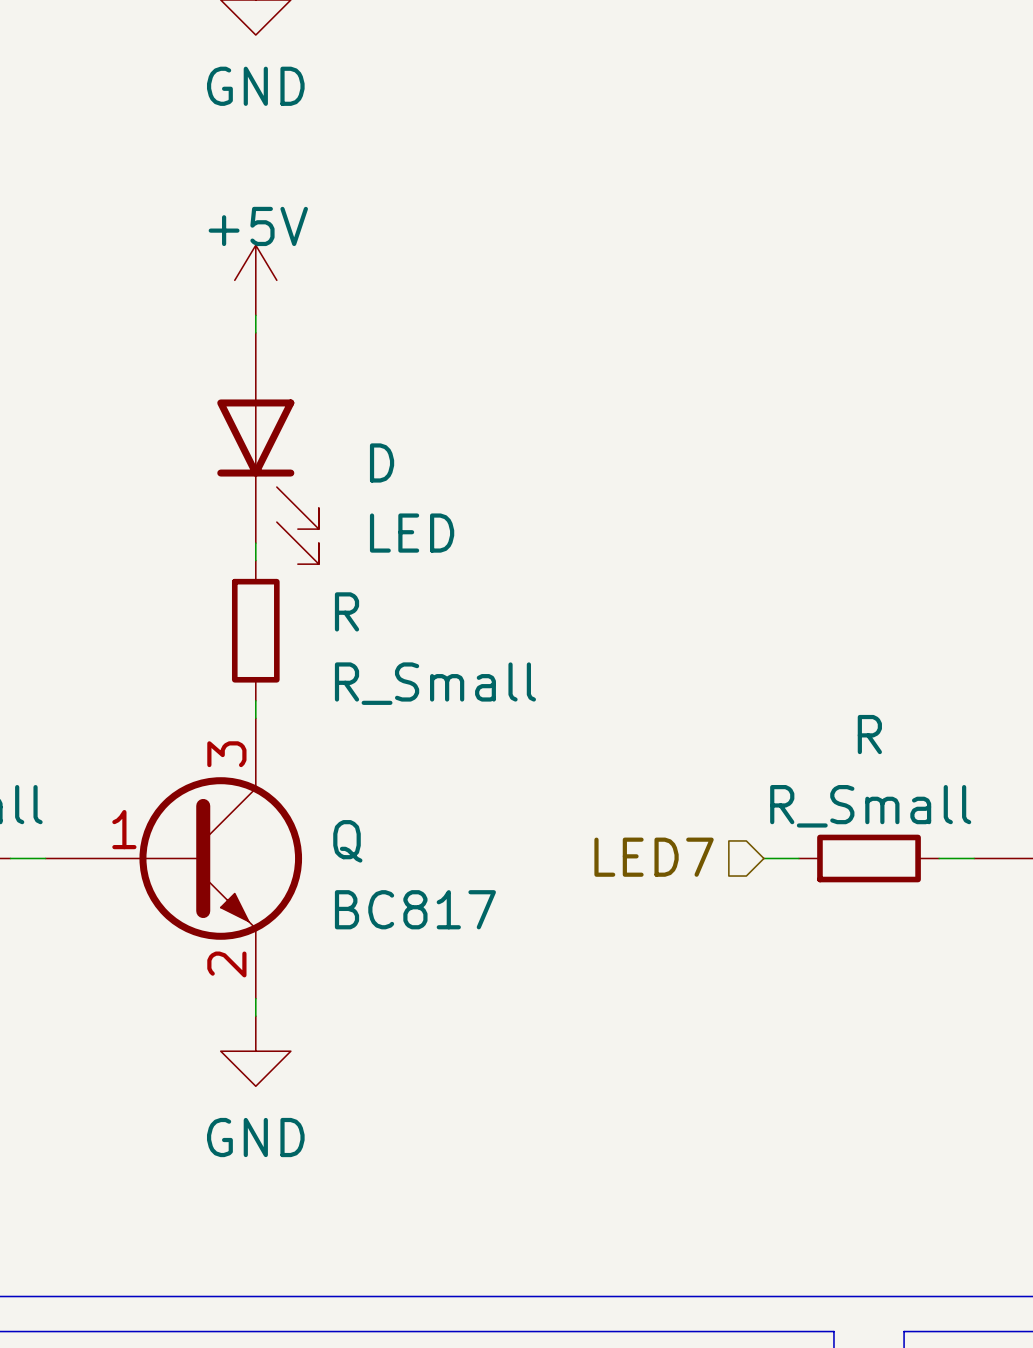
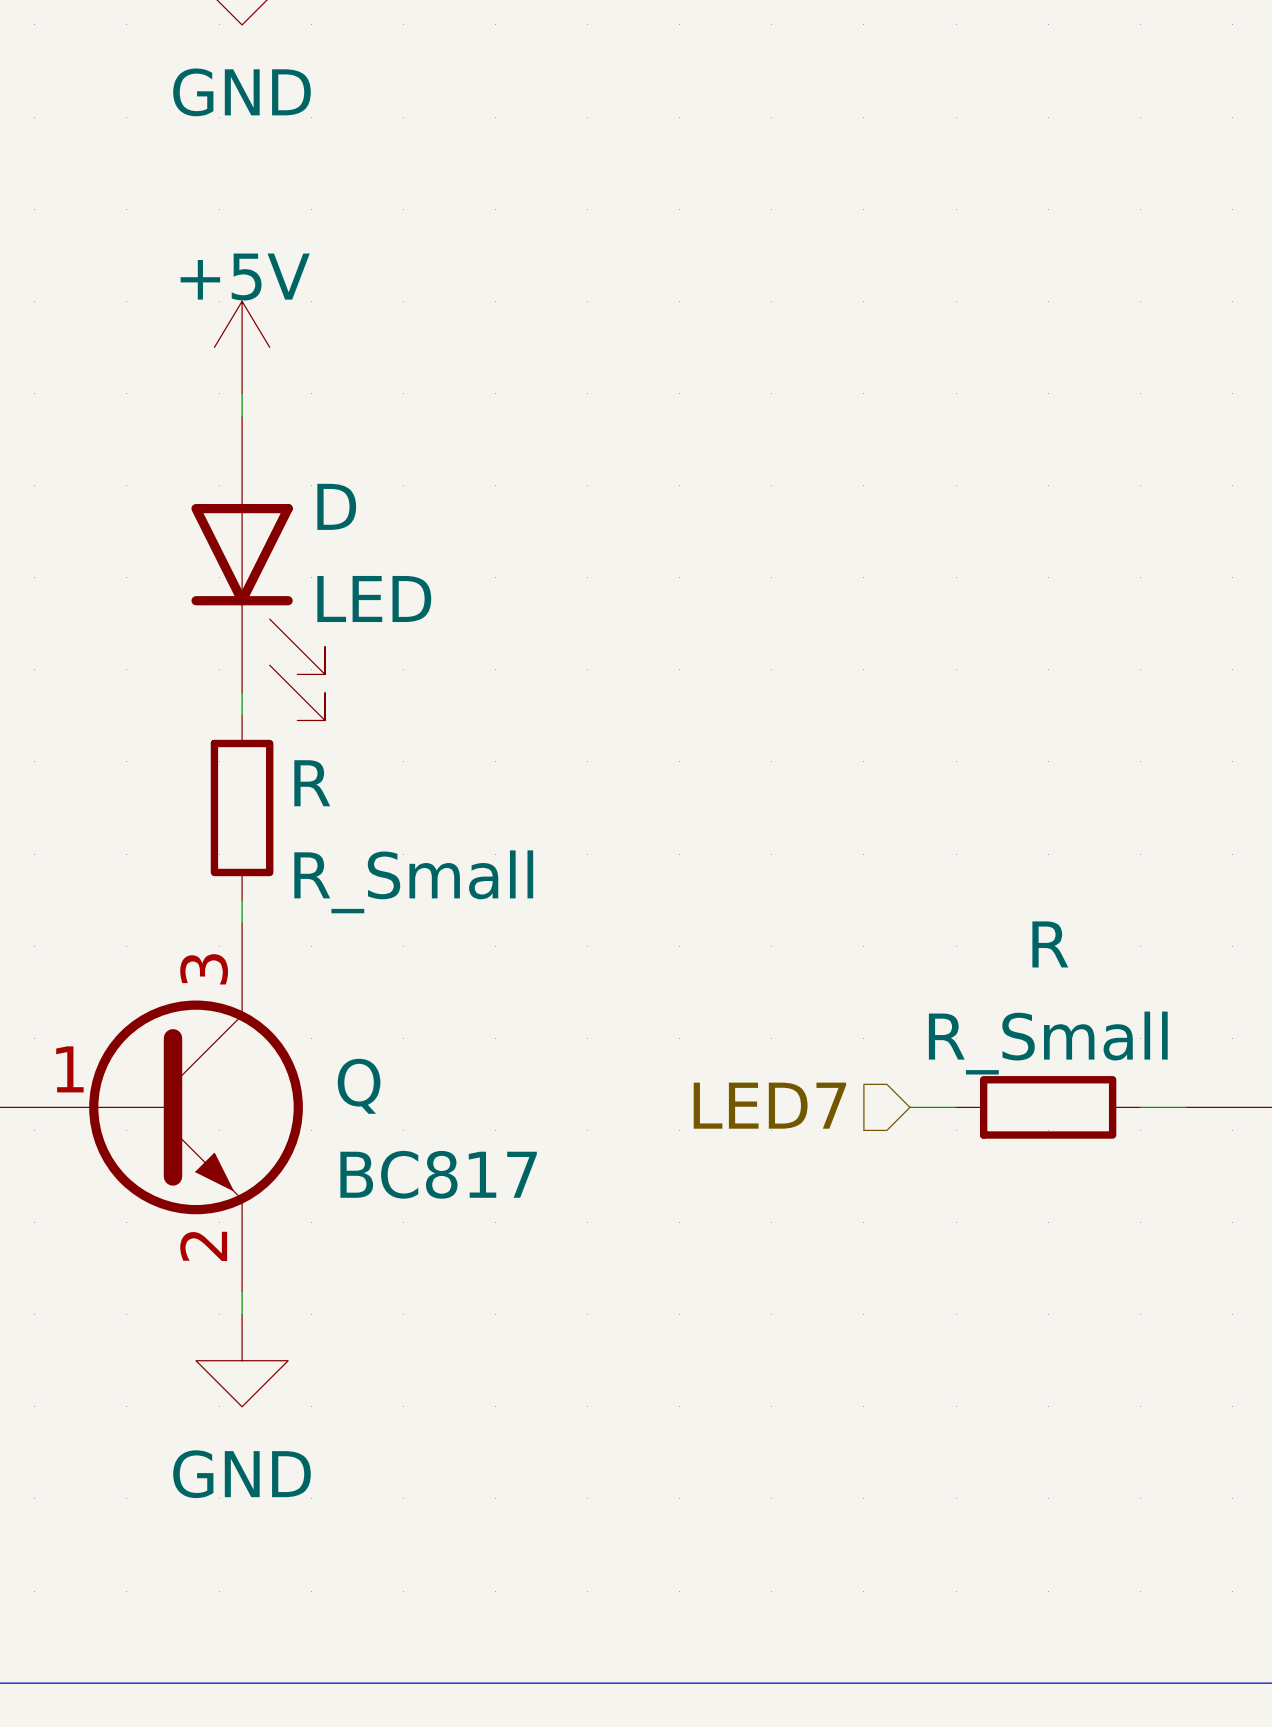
D name position: D (382, 462) -> D (336, 506)
D value position: LED (412, 533) -> LED (374, 598)
R name position: R (347, 611) -> R (312, 783)
R value position: R_Small (435, 683) -> R_Small (413, 881)

